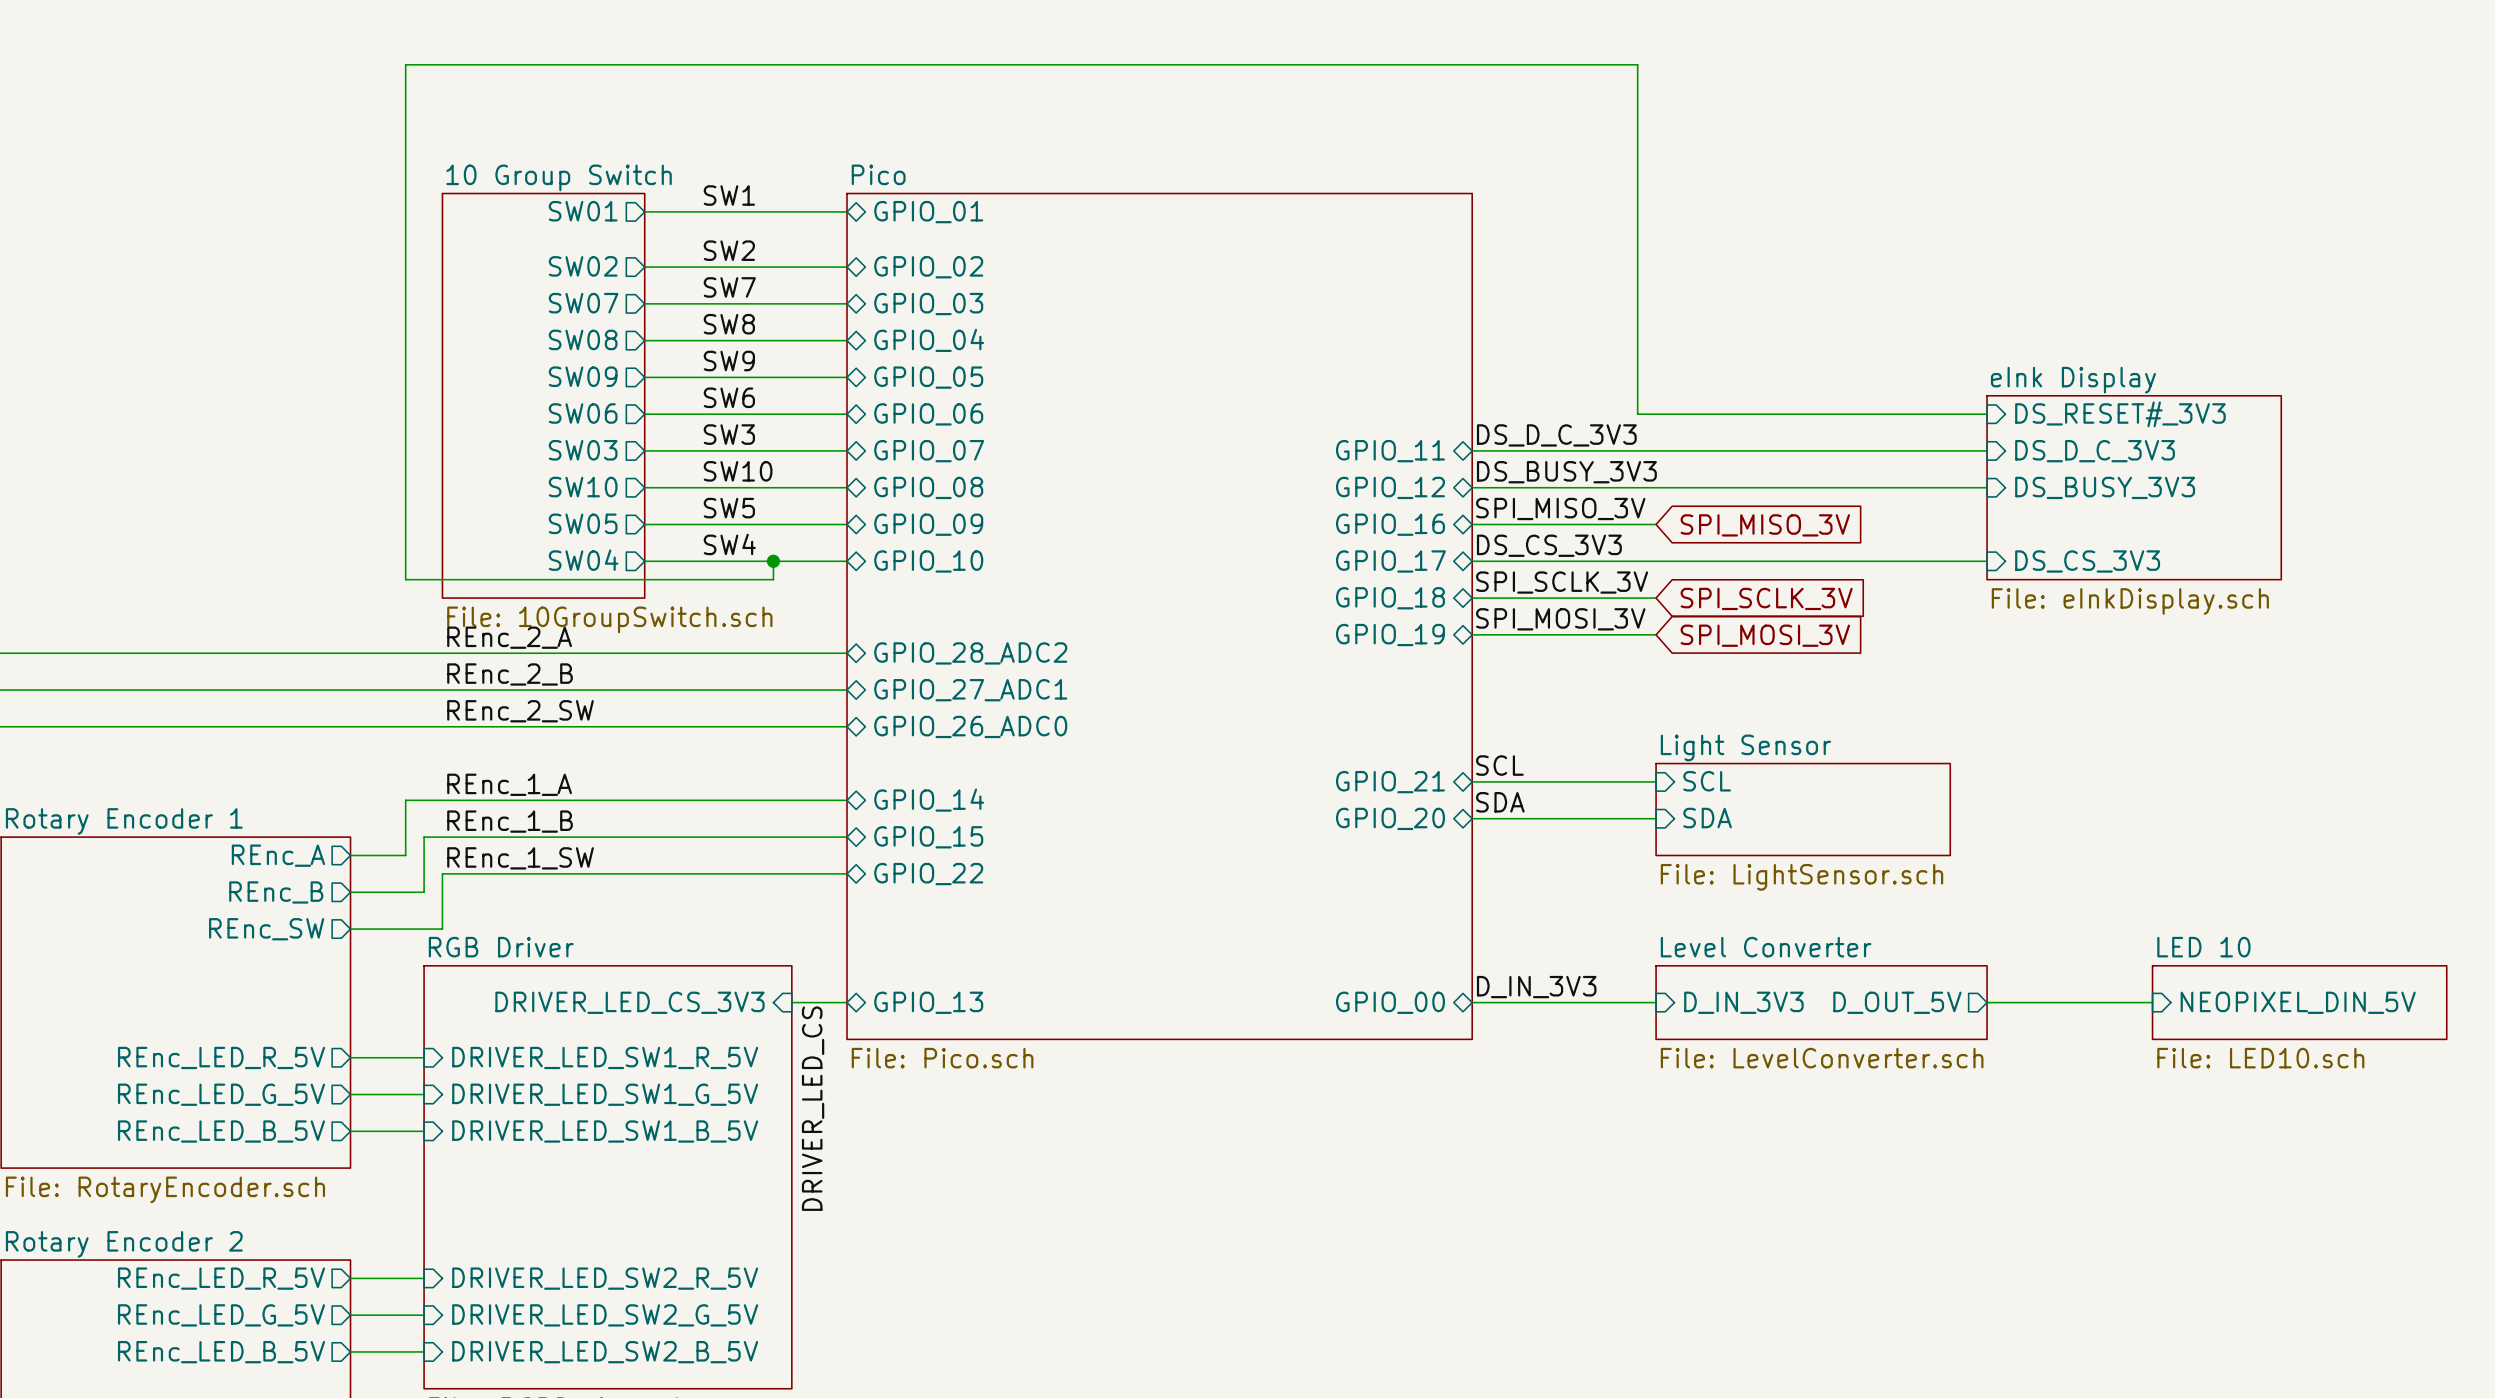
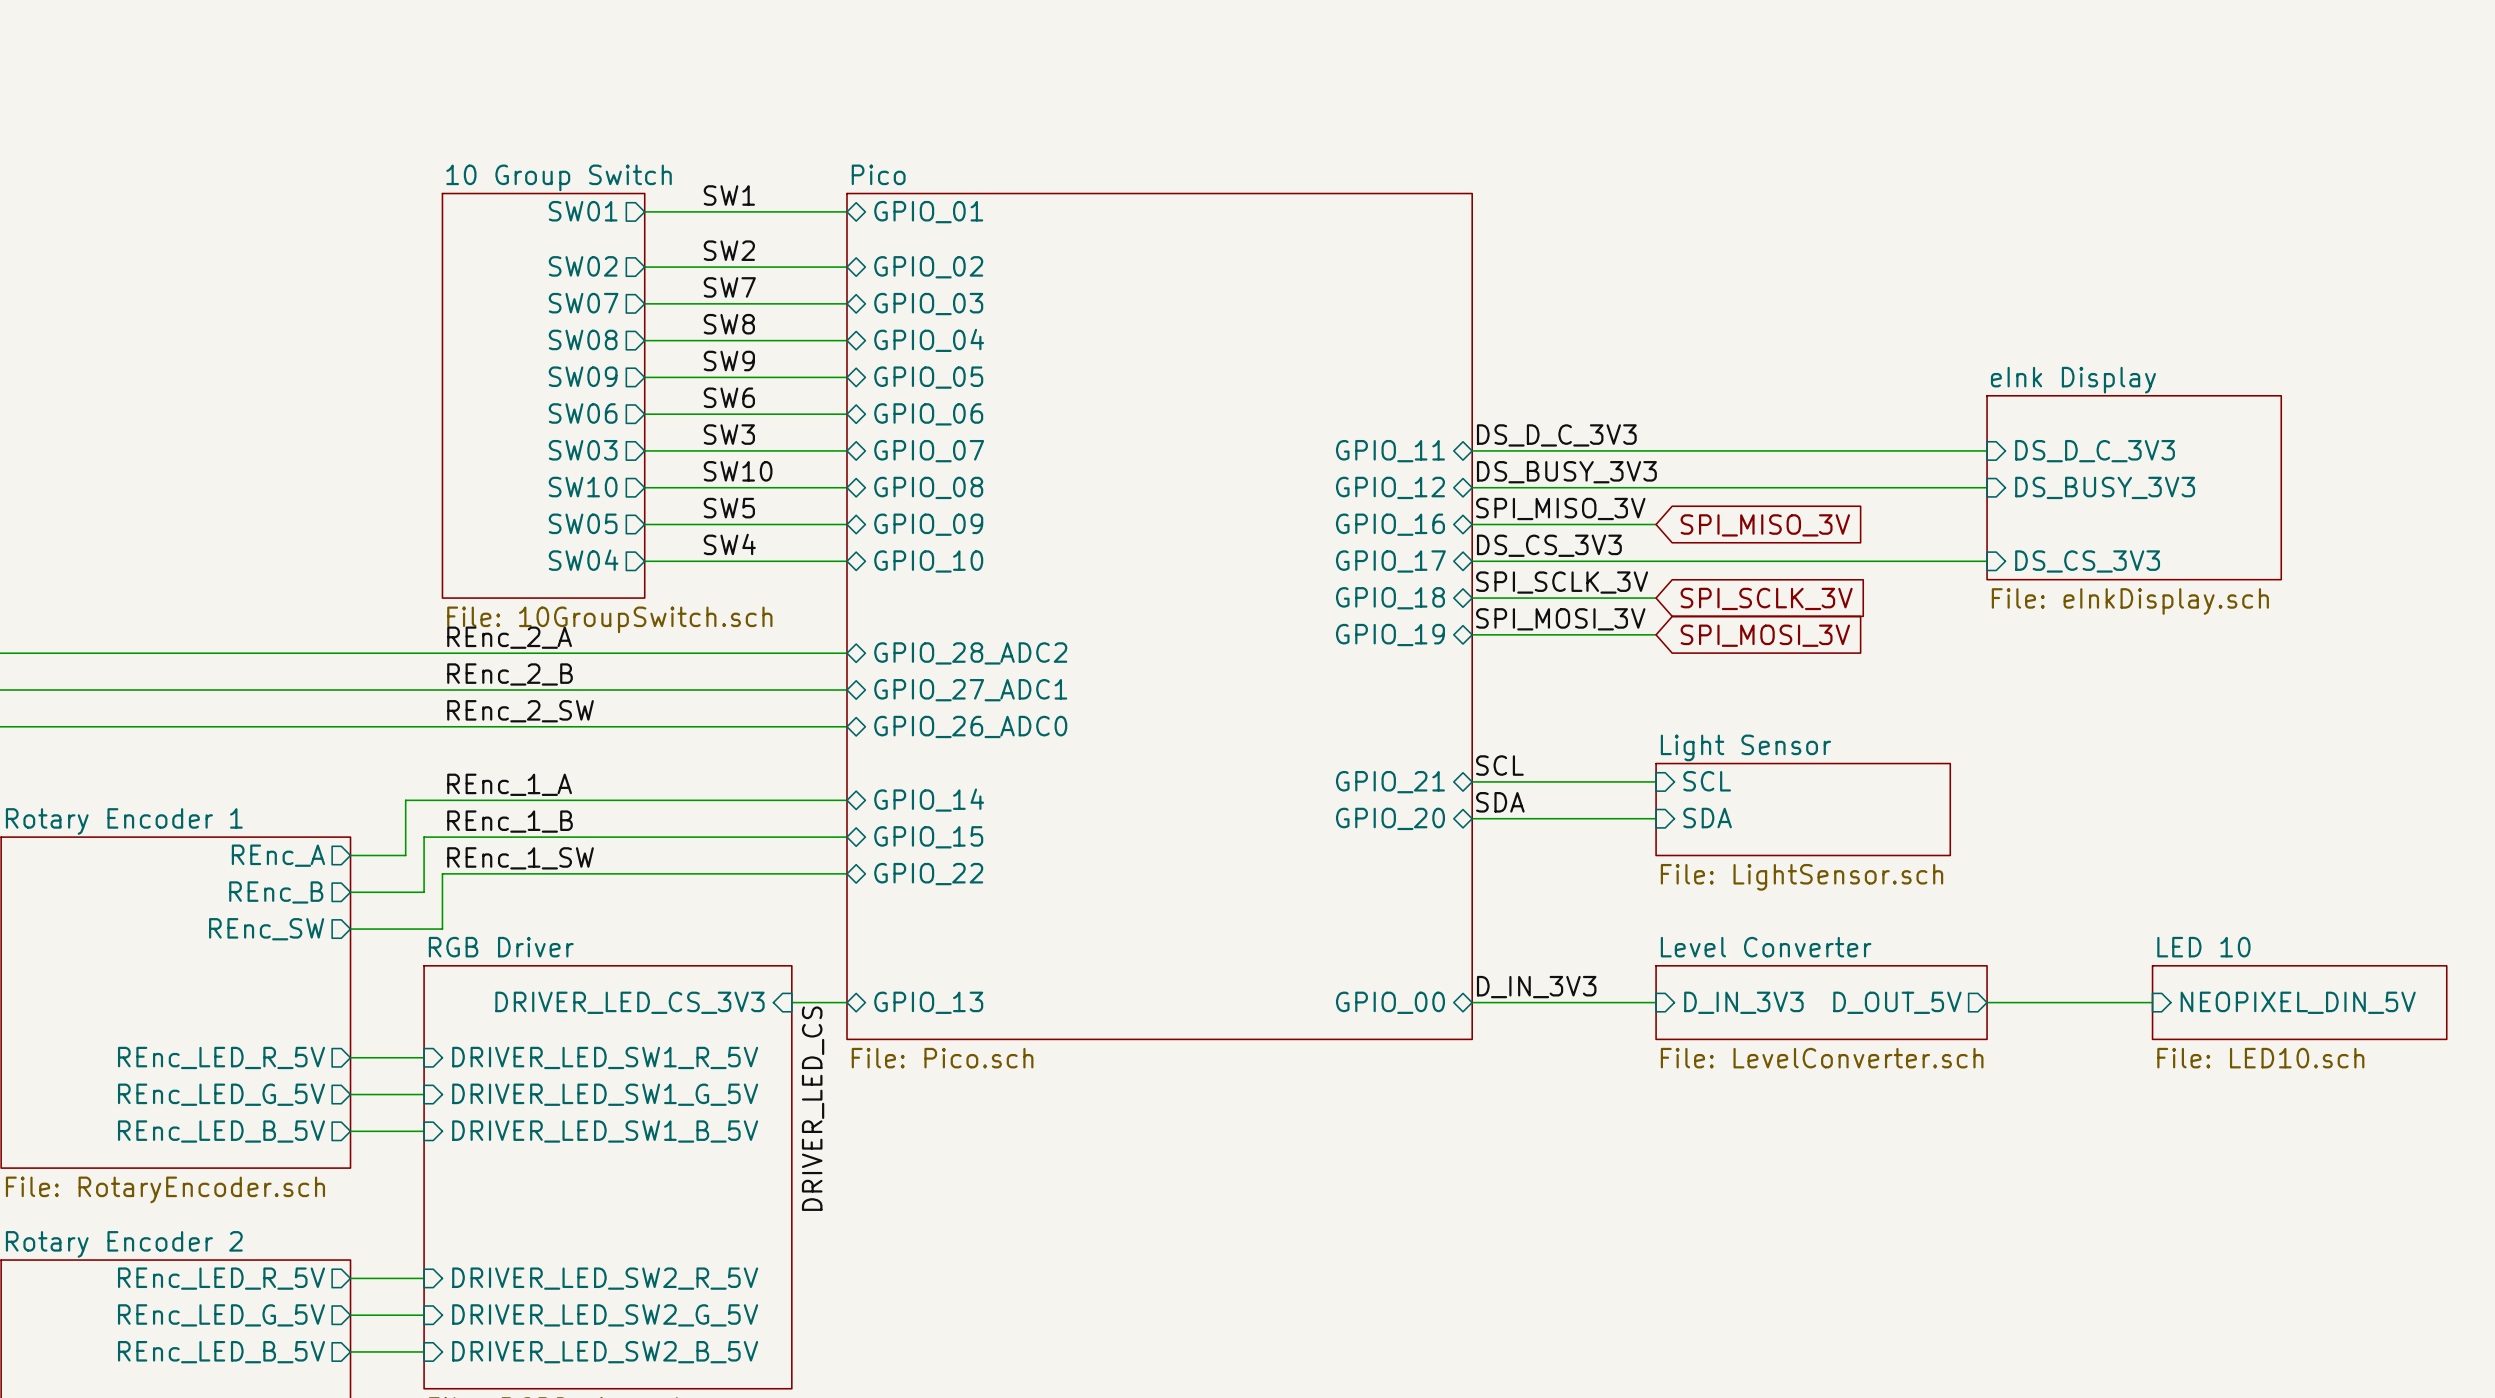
wire: (1987, 414) (1637, 414) (1637, 64) (405, 64) (405, 579) (773, 579) (773, 561) -> none
sheet pin: DS_RESET#_3V3 (2120, 414) -> none
junction: (773, 561) -> none

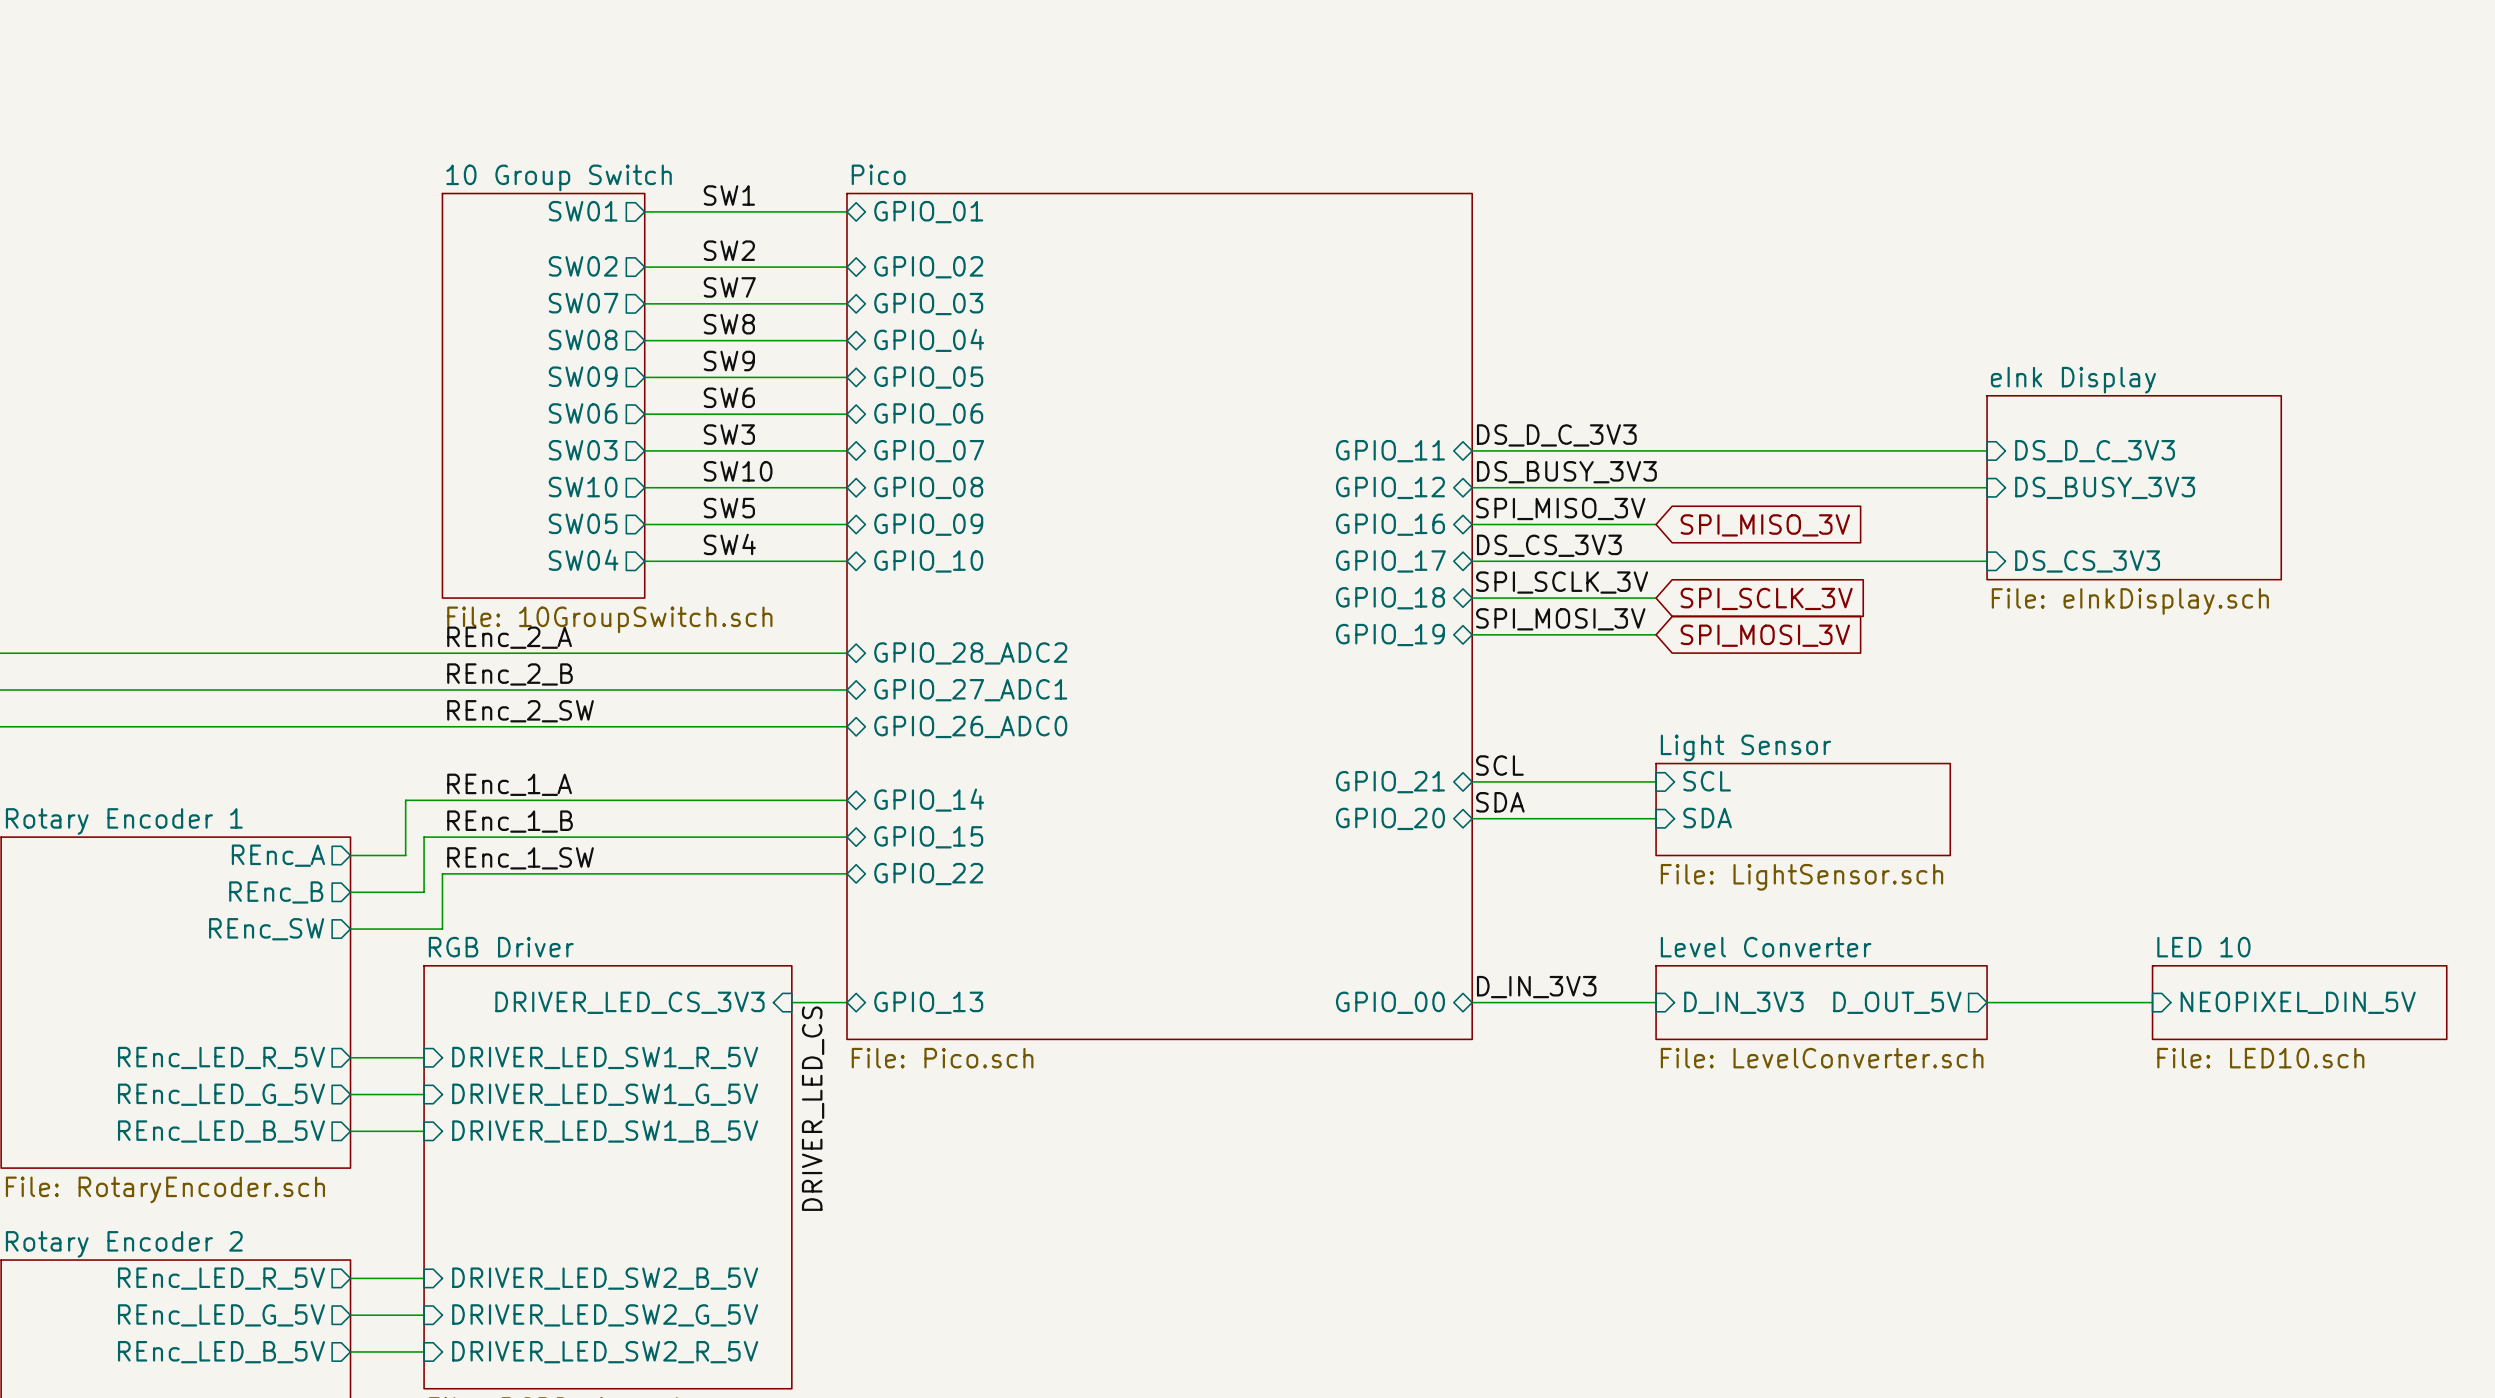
sheet pin: DRIVER_LED_SW2_R_5V (605, 1278) -> DRIVER_LED_SW2_B_5V (605, 1278)
sheet pin: DRIVER_LED_SW2_B_5V (605, 1352) -> DRIVER_LED_SW2_R_5V (605, 1352)

